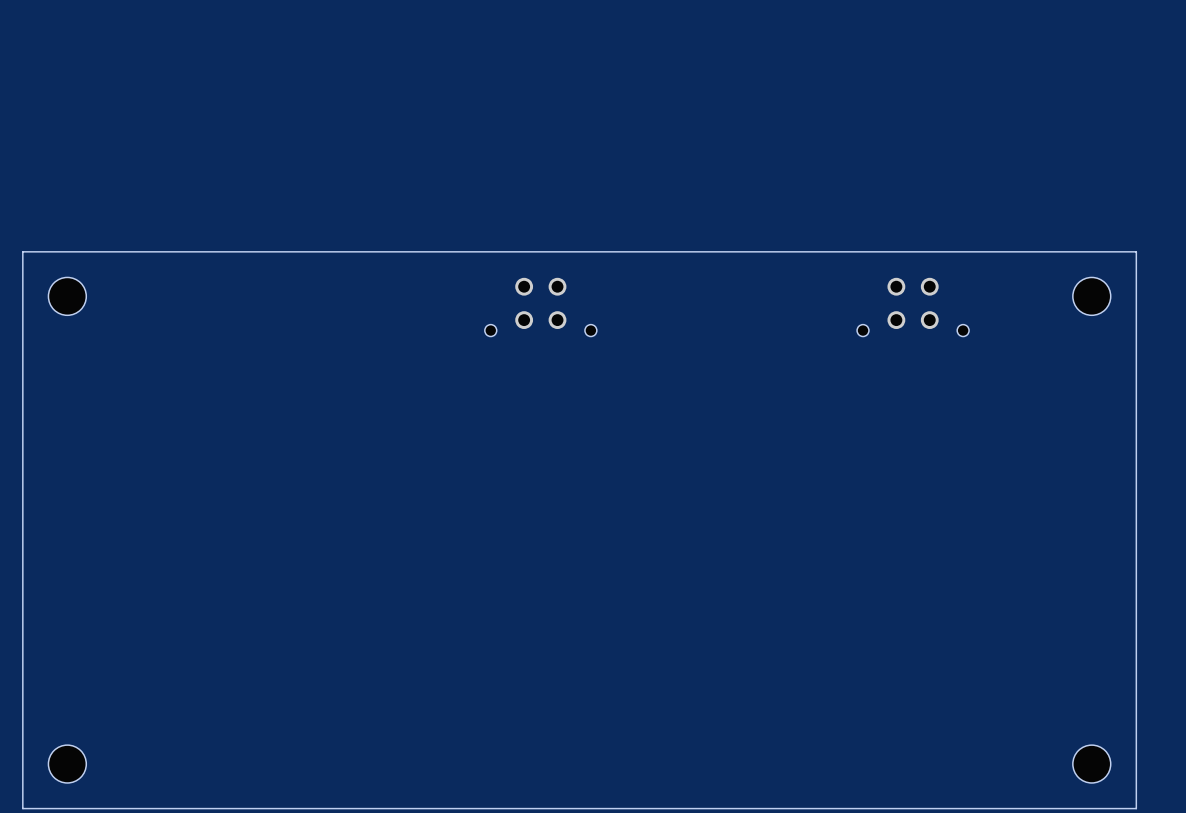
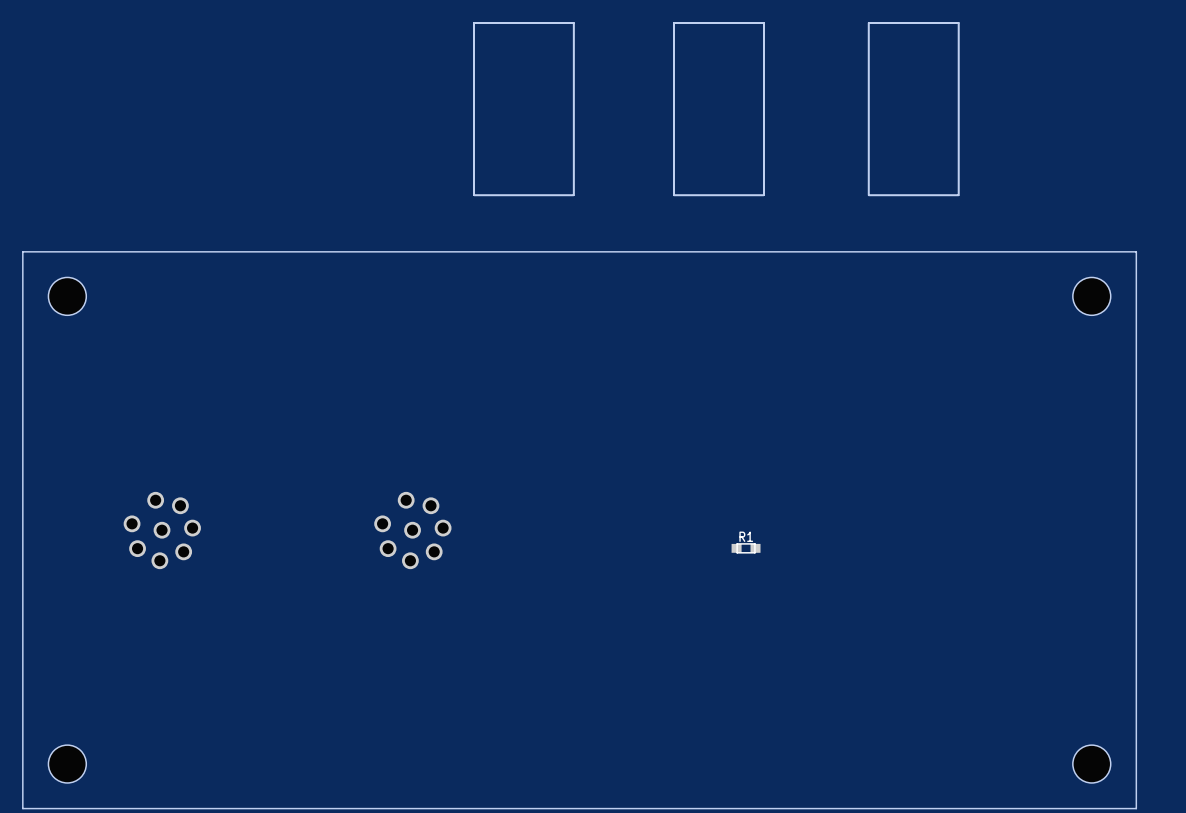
part: none -> (523, 109)
part: none -> (718, 109)
part: none -> (913, 109)
part: (540, 307) -> none
part: (913, 307) -> none
part: none -> (162, 530)
part: none -> (412, 530)
R1: none -> (746, 548)

